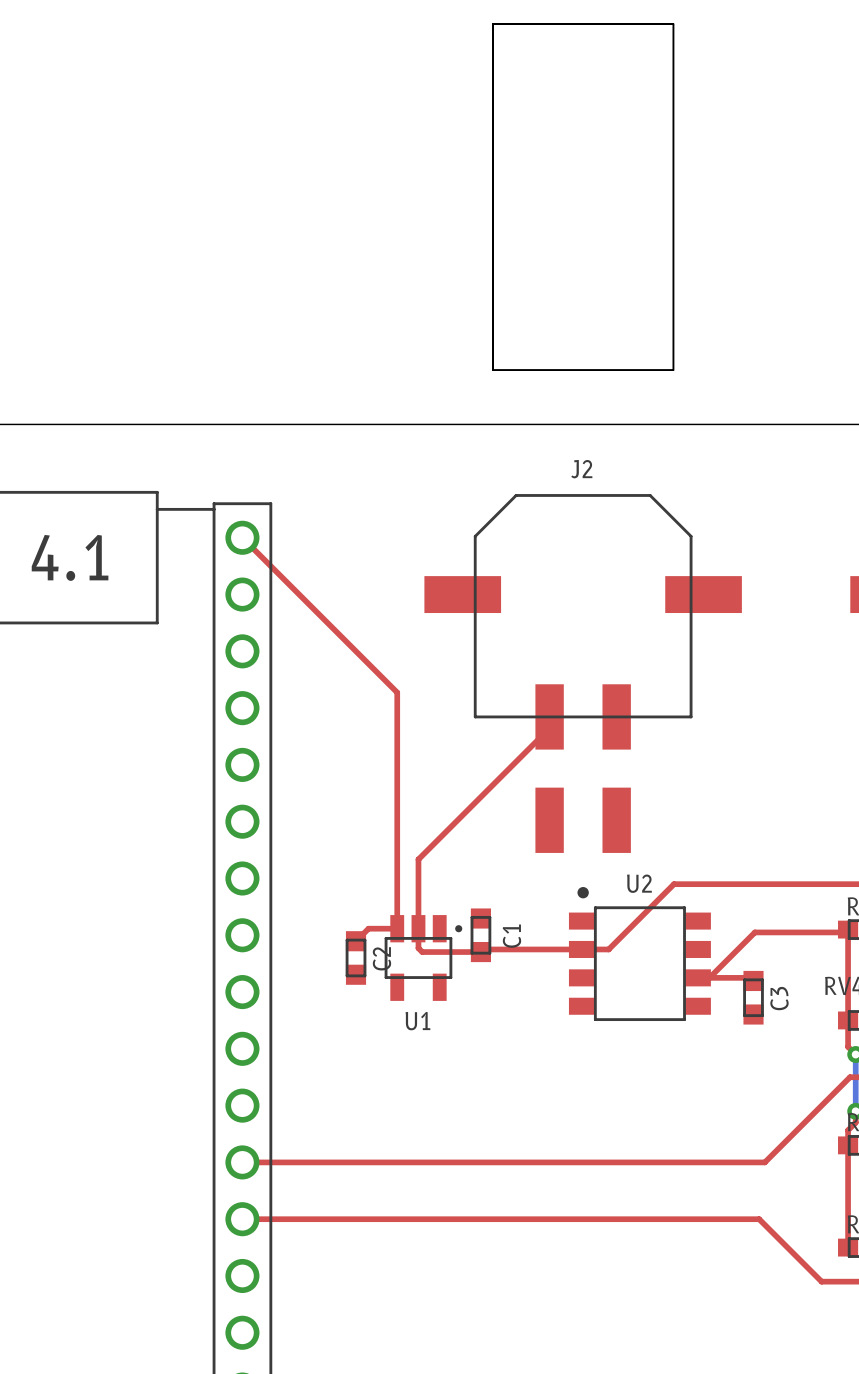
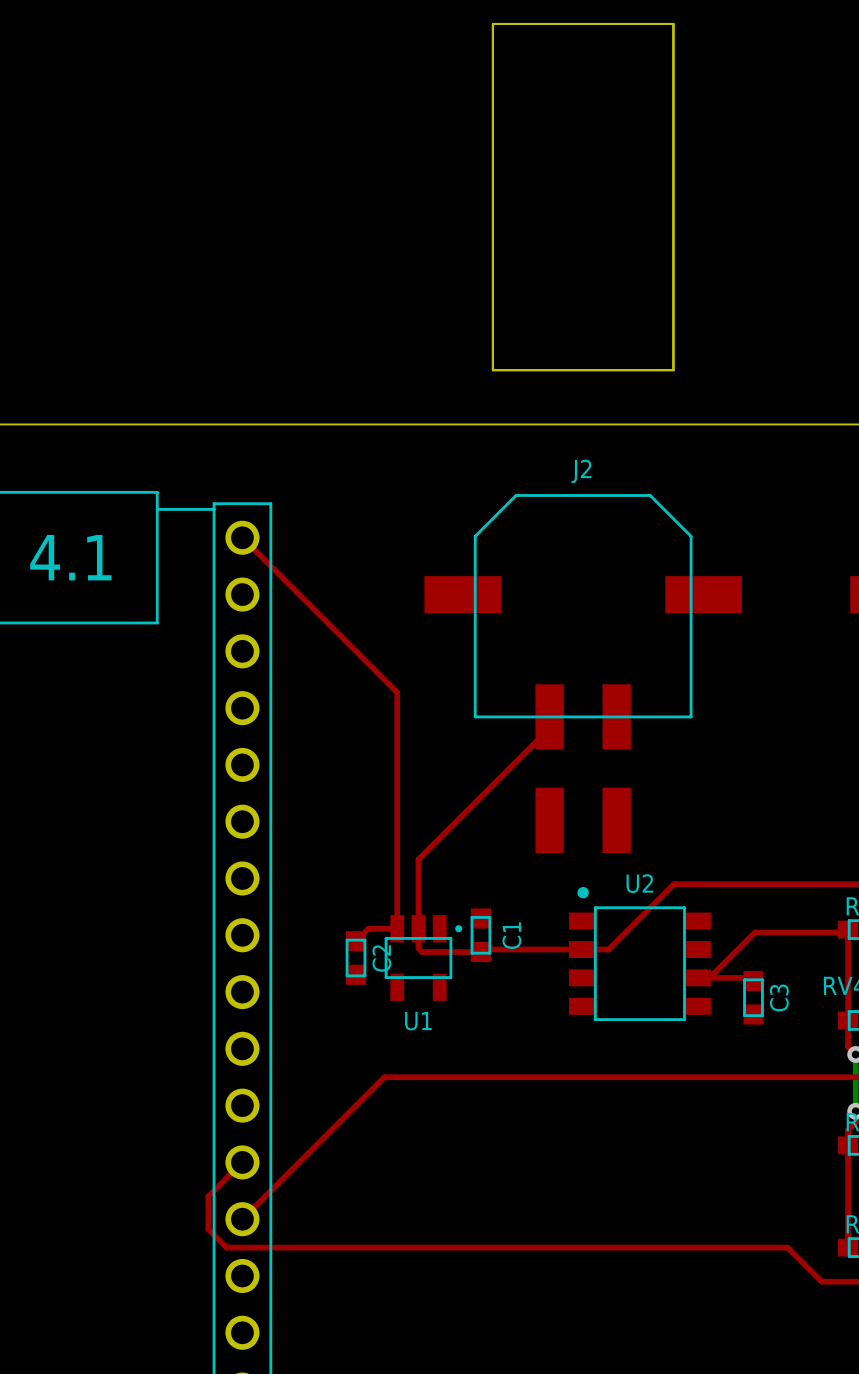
top track: (850, 1077) (764, 1162) (242, 1162) -> (850, 1077) (384, 1077) (242, 1219)
top track: (242, 1219) (759, 1219) (787, 1247) -> (242, 1162) (208, 1196) (208, 1229) (226, 1247) (787, 1247)

